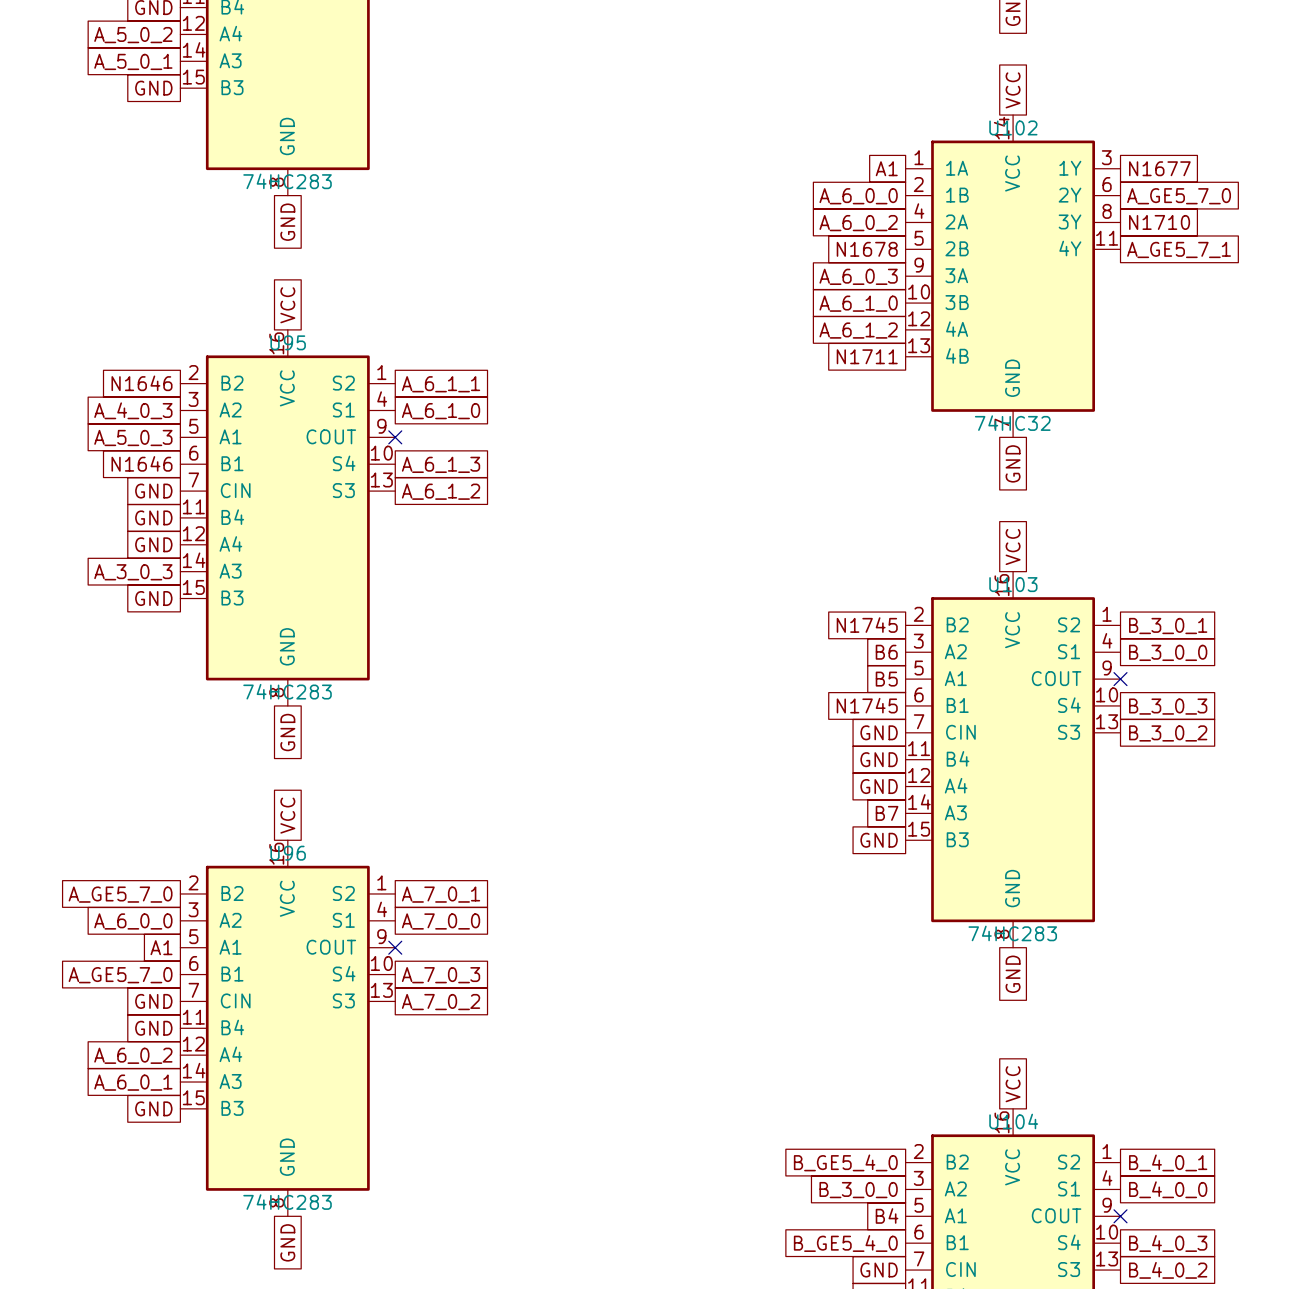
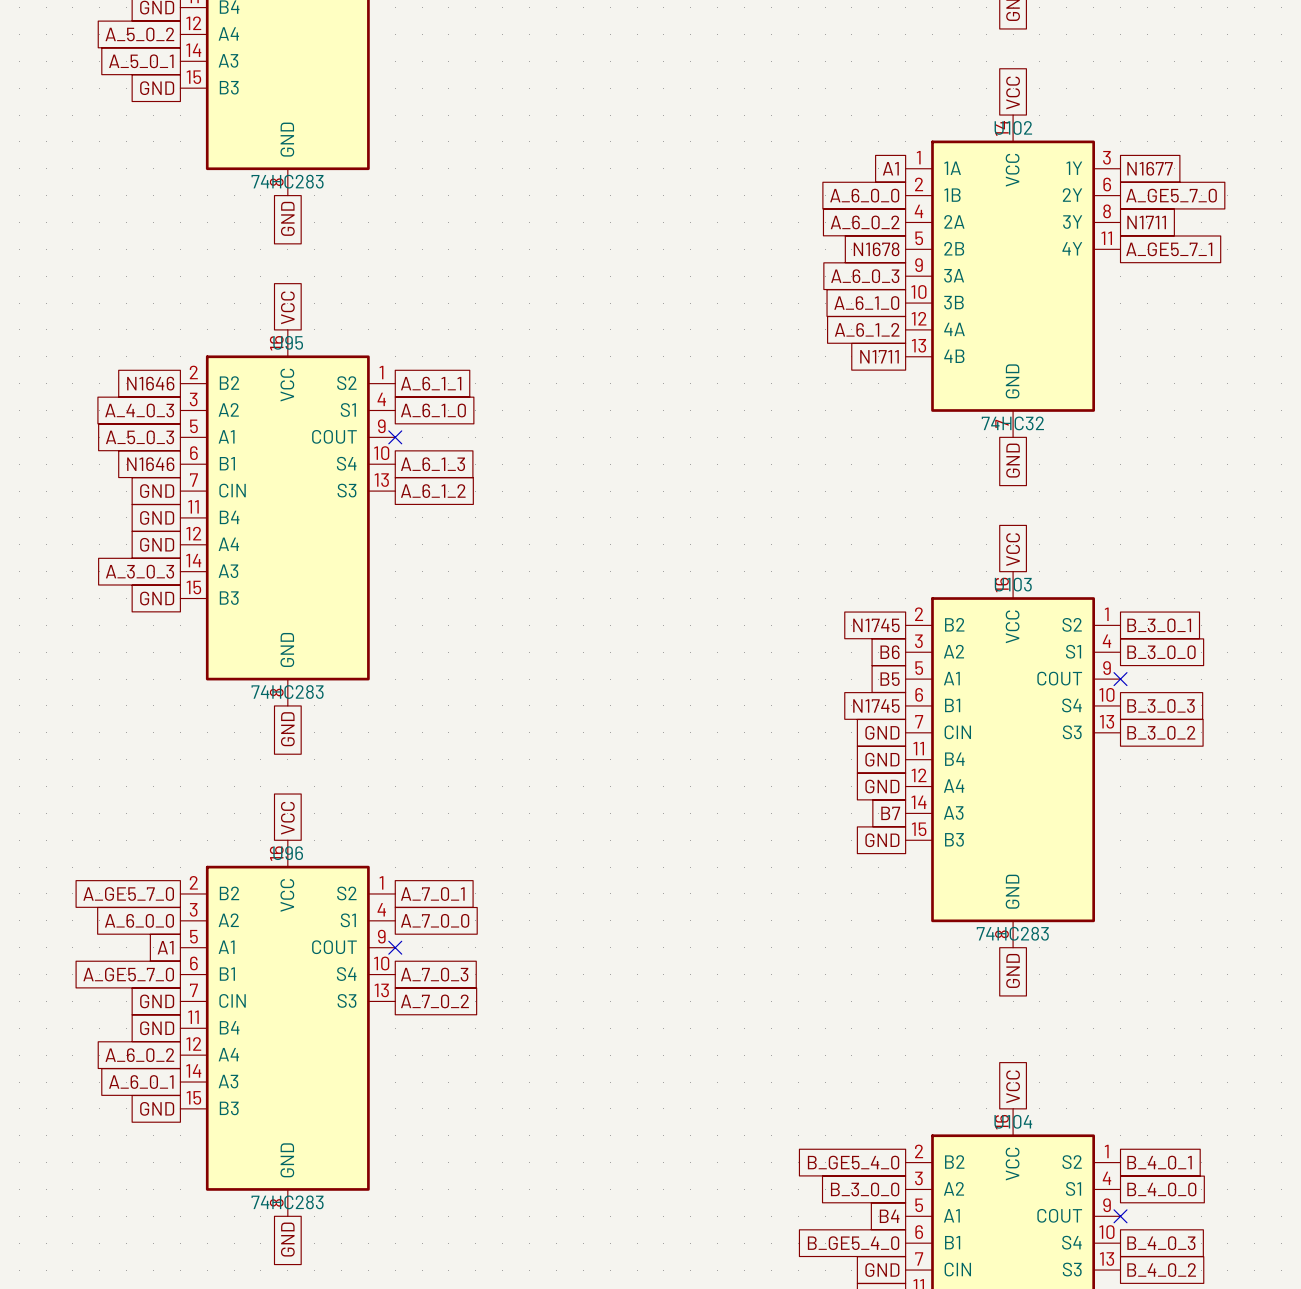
global label: N1710 (1159, 222) -> N1711 (1146, 222)

